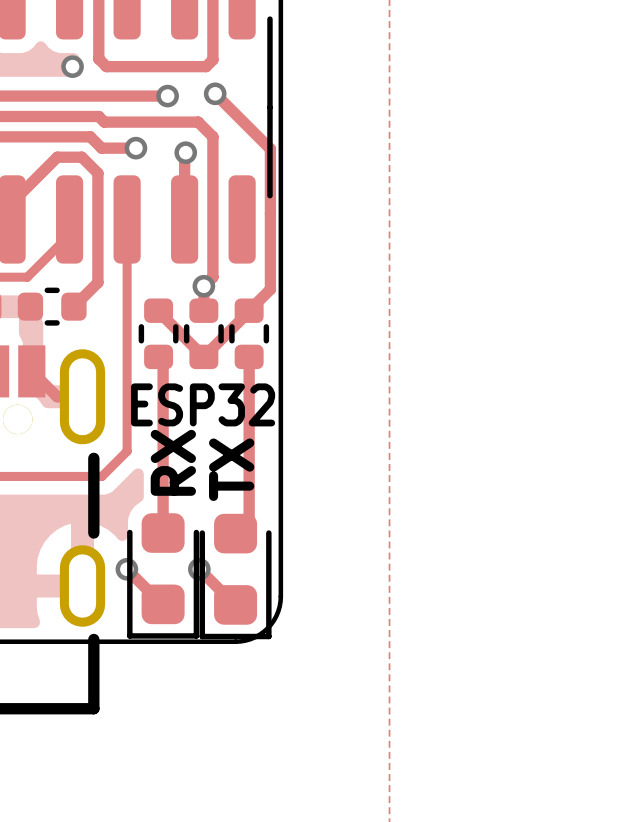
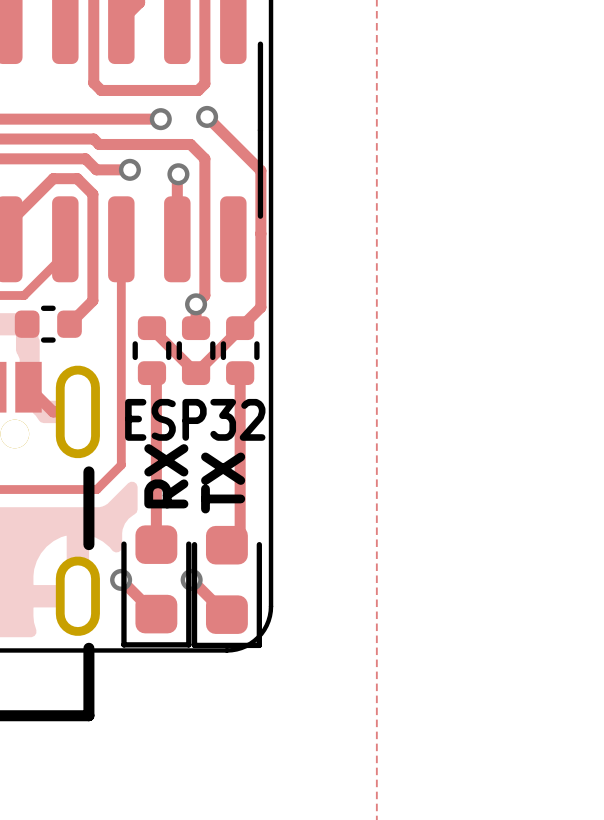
via: (72, 66) -> none

